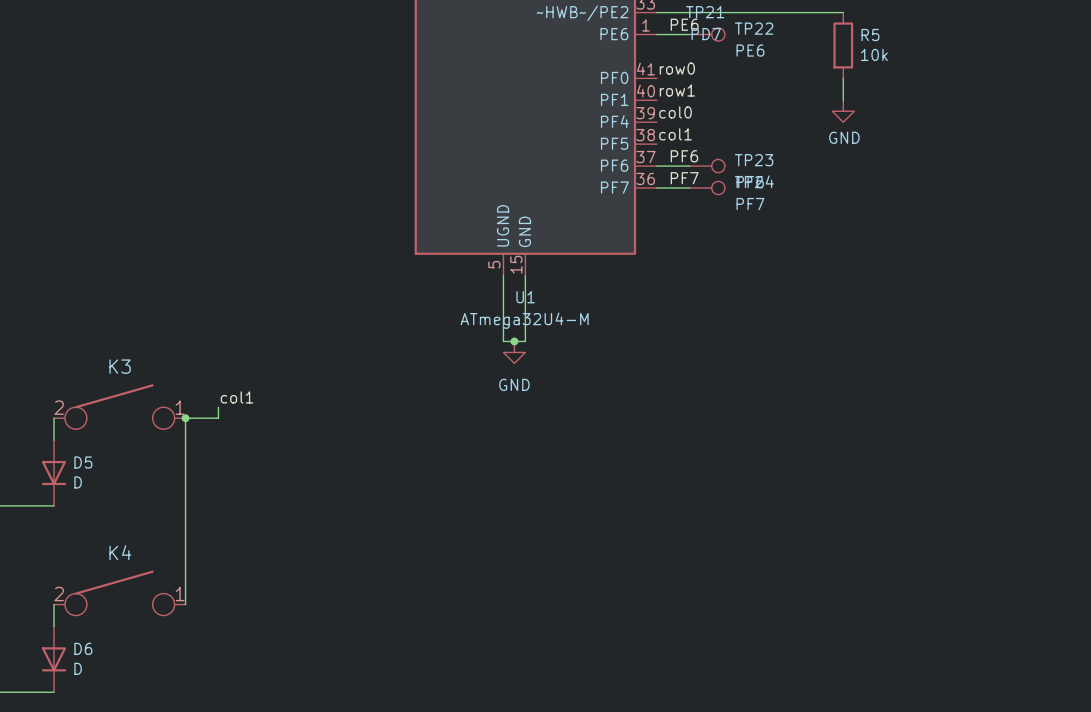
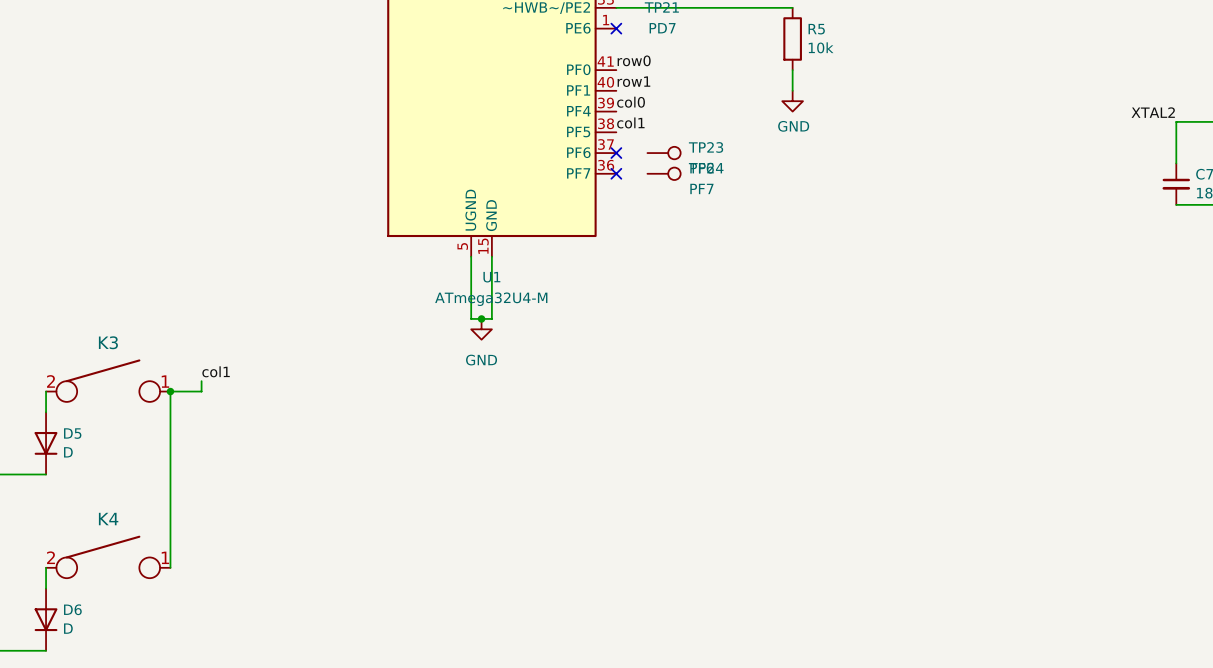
label: PE6 (684, 24) -> none
wire: (656, 34) (689, 34) -> none
no-connect mark: none -> (616, 28)
TP22: PE6 (707, 34) -> none
label: PF6 (684, 156) -> none
wire: (656, 166) (689, 166) -> none
no-connect mark: none -> (616, 153)
label: PF7 (684, 178) -> none
wire: (656, 187) (689, 187) -> none
no-connect mark: none -> (616, 173)

